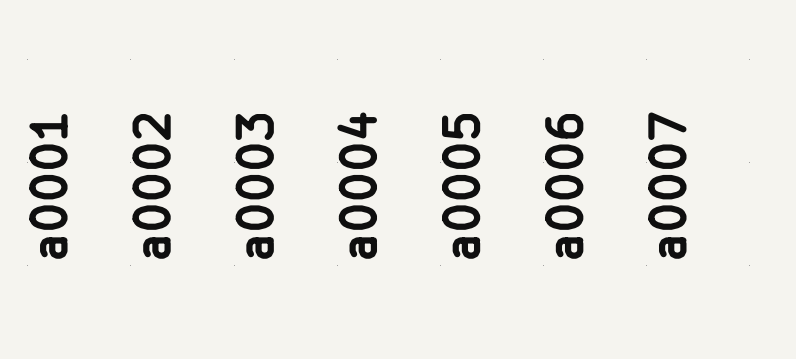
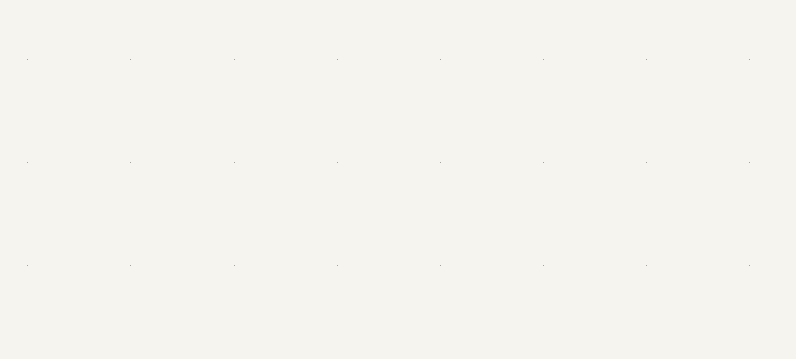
label: a0004 (357, 185) -> none
label: a0007 (667, 185) -> none
label: a0001 (48, 186) -> none
label: a0002 (151, 186) -> none
label: a0003 (254, 186) -> none
label: a0005 (461, 186) -> none
label: a0006 (564, 186) -> none

